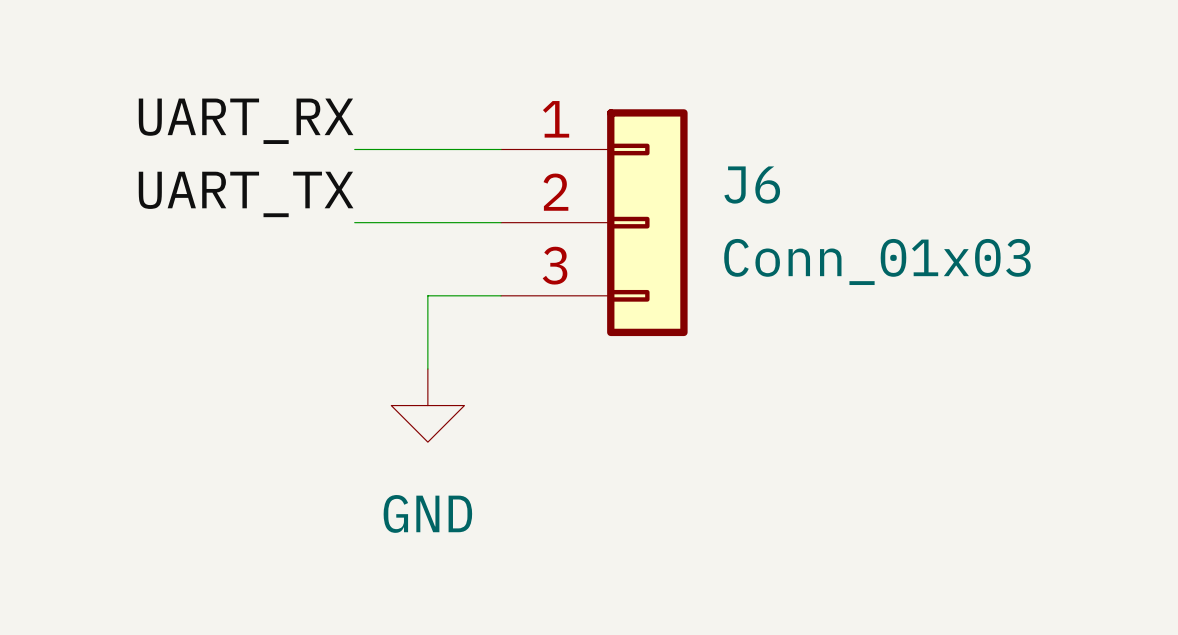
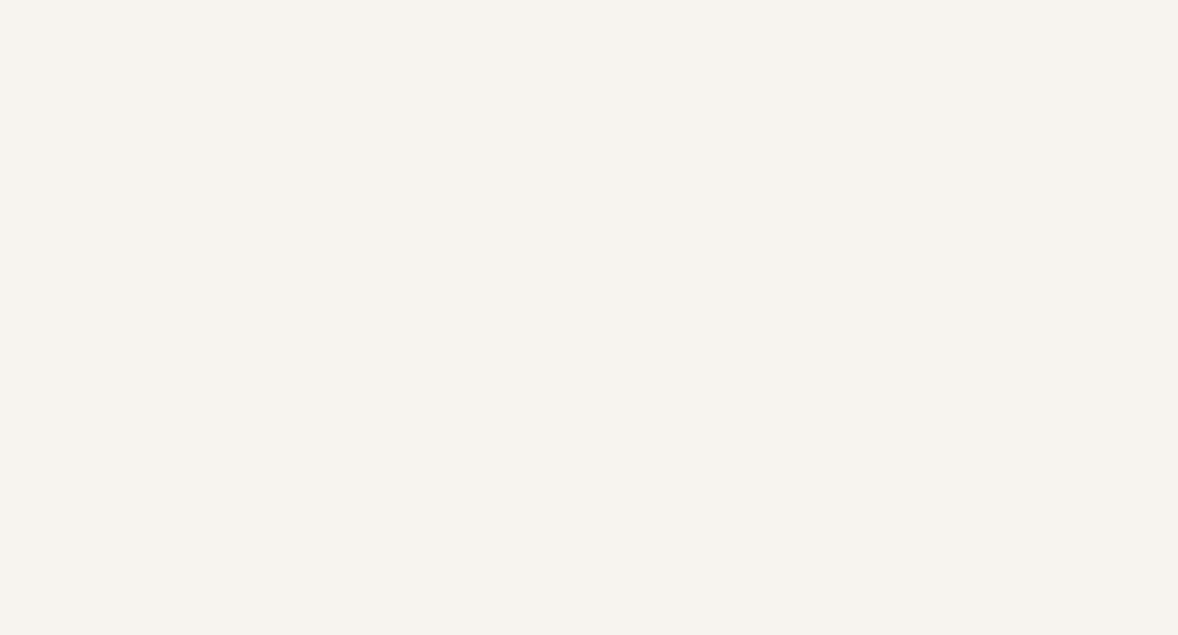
label: UART_RX (246, 121) -> none
wire: (354, 149) (501, 149) -> none
label: UART_TX (246, 194) -> none
wire: (354, 222) (501, 222) -> none
J6: Conn_01x03 (594, 222) -> none
wire: (501, 295) (427, 295) (427, 368) -> none
power symbol: GND (427, 405) -> none

